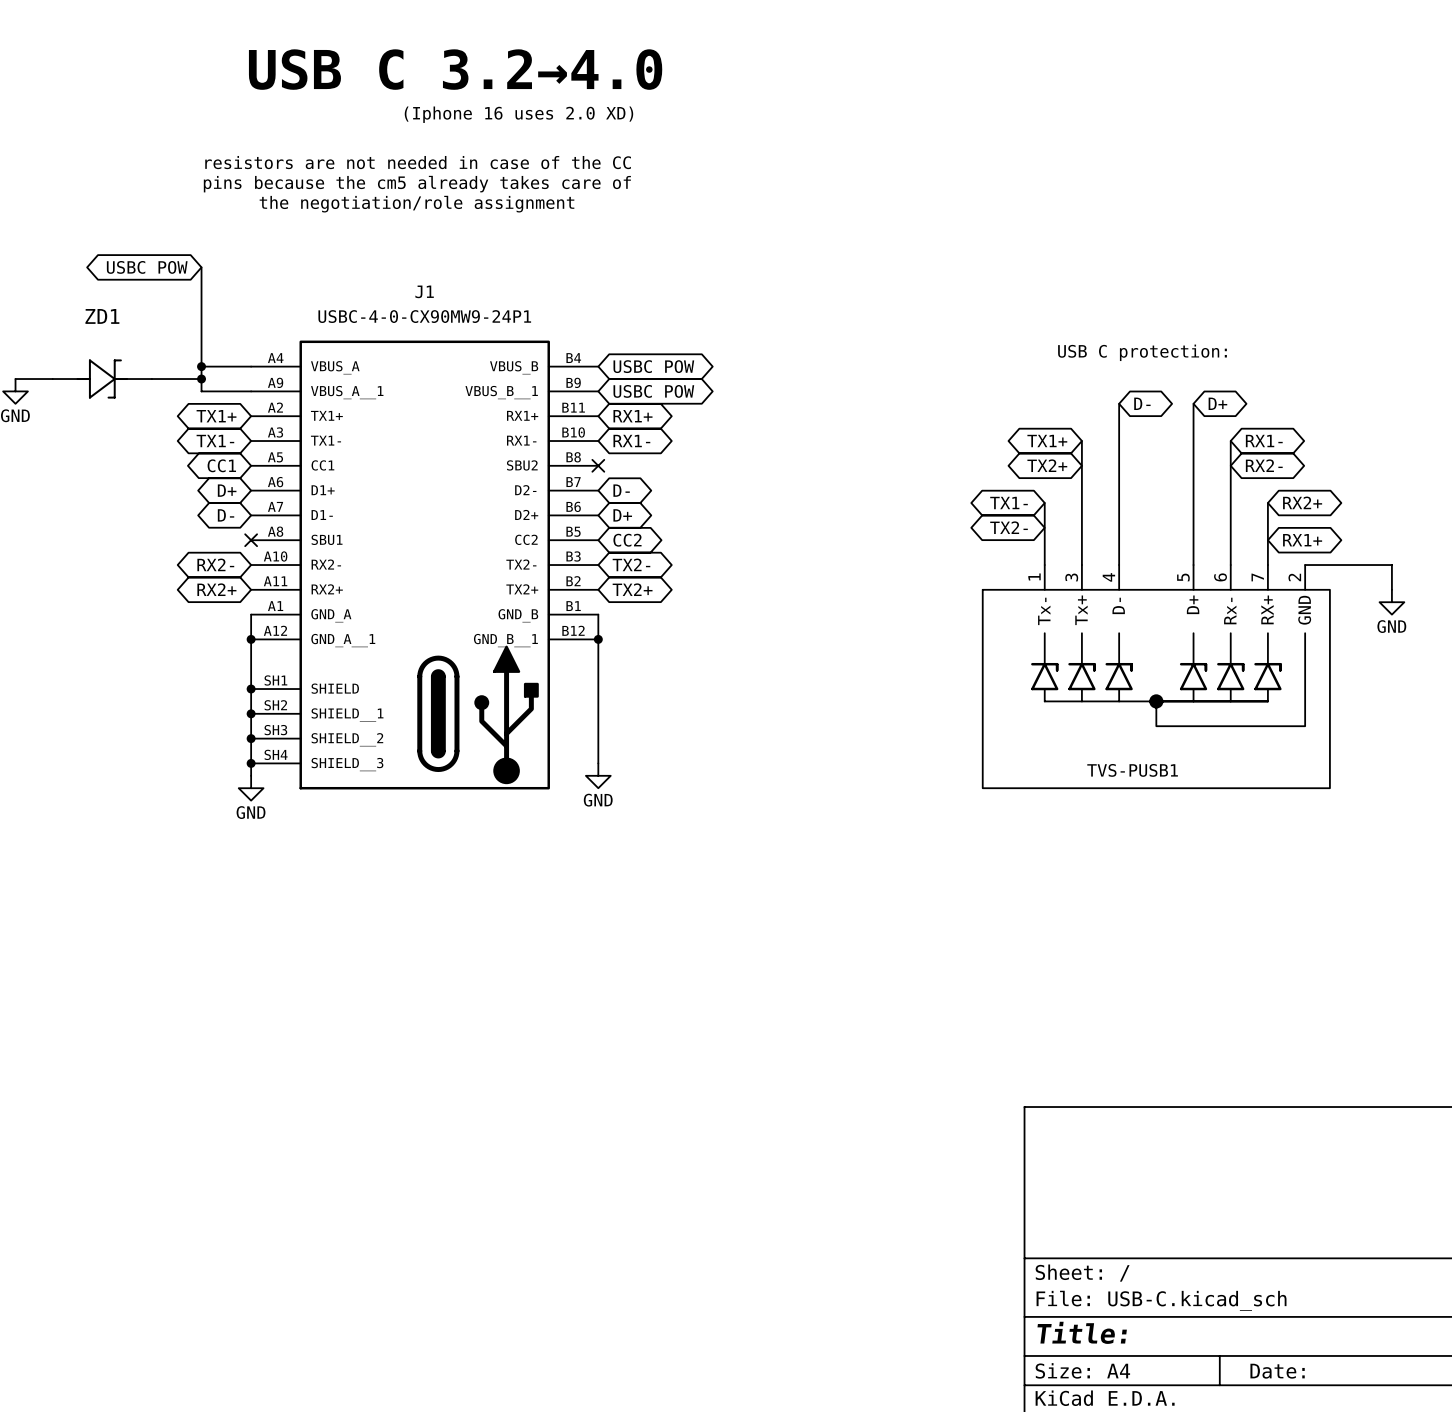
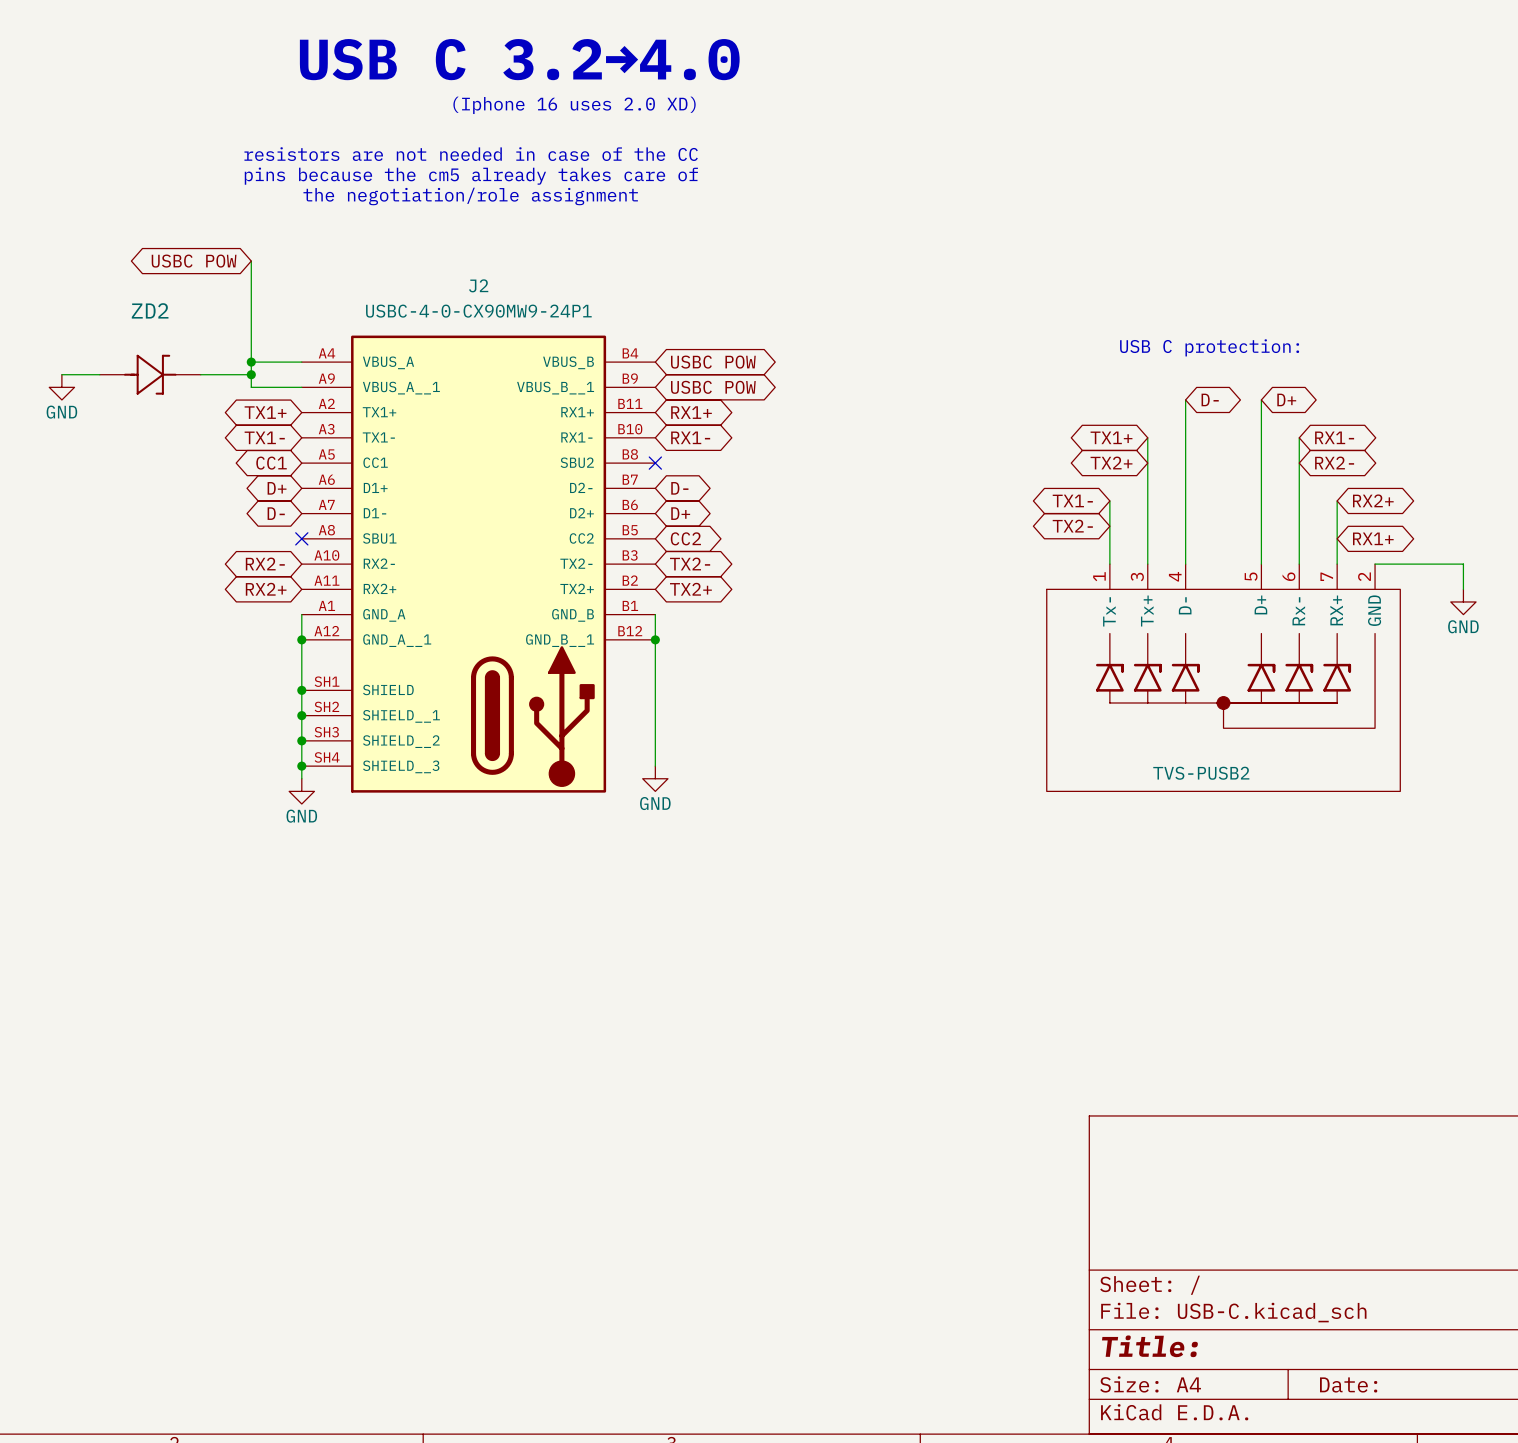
J1 name: J1 (424, 291) -> J2 (478, 285)
ZD1 name: ZD1 (102, 316) -> ZD2 (150, 310)
TVS-PUSB1 name: TVS-PUSB1 (1132, 770) -> TVS-PUSB2 (1201, 773)

